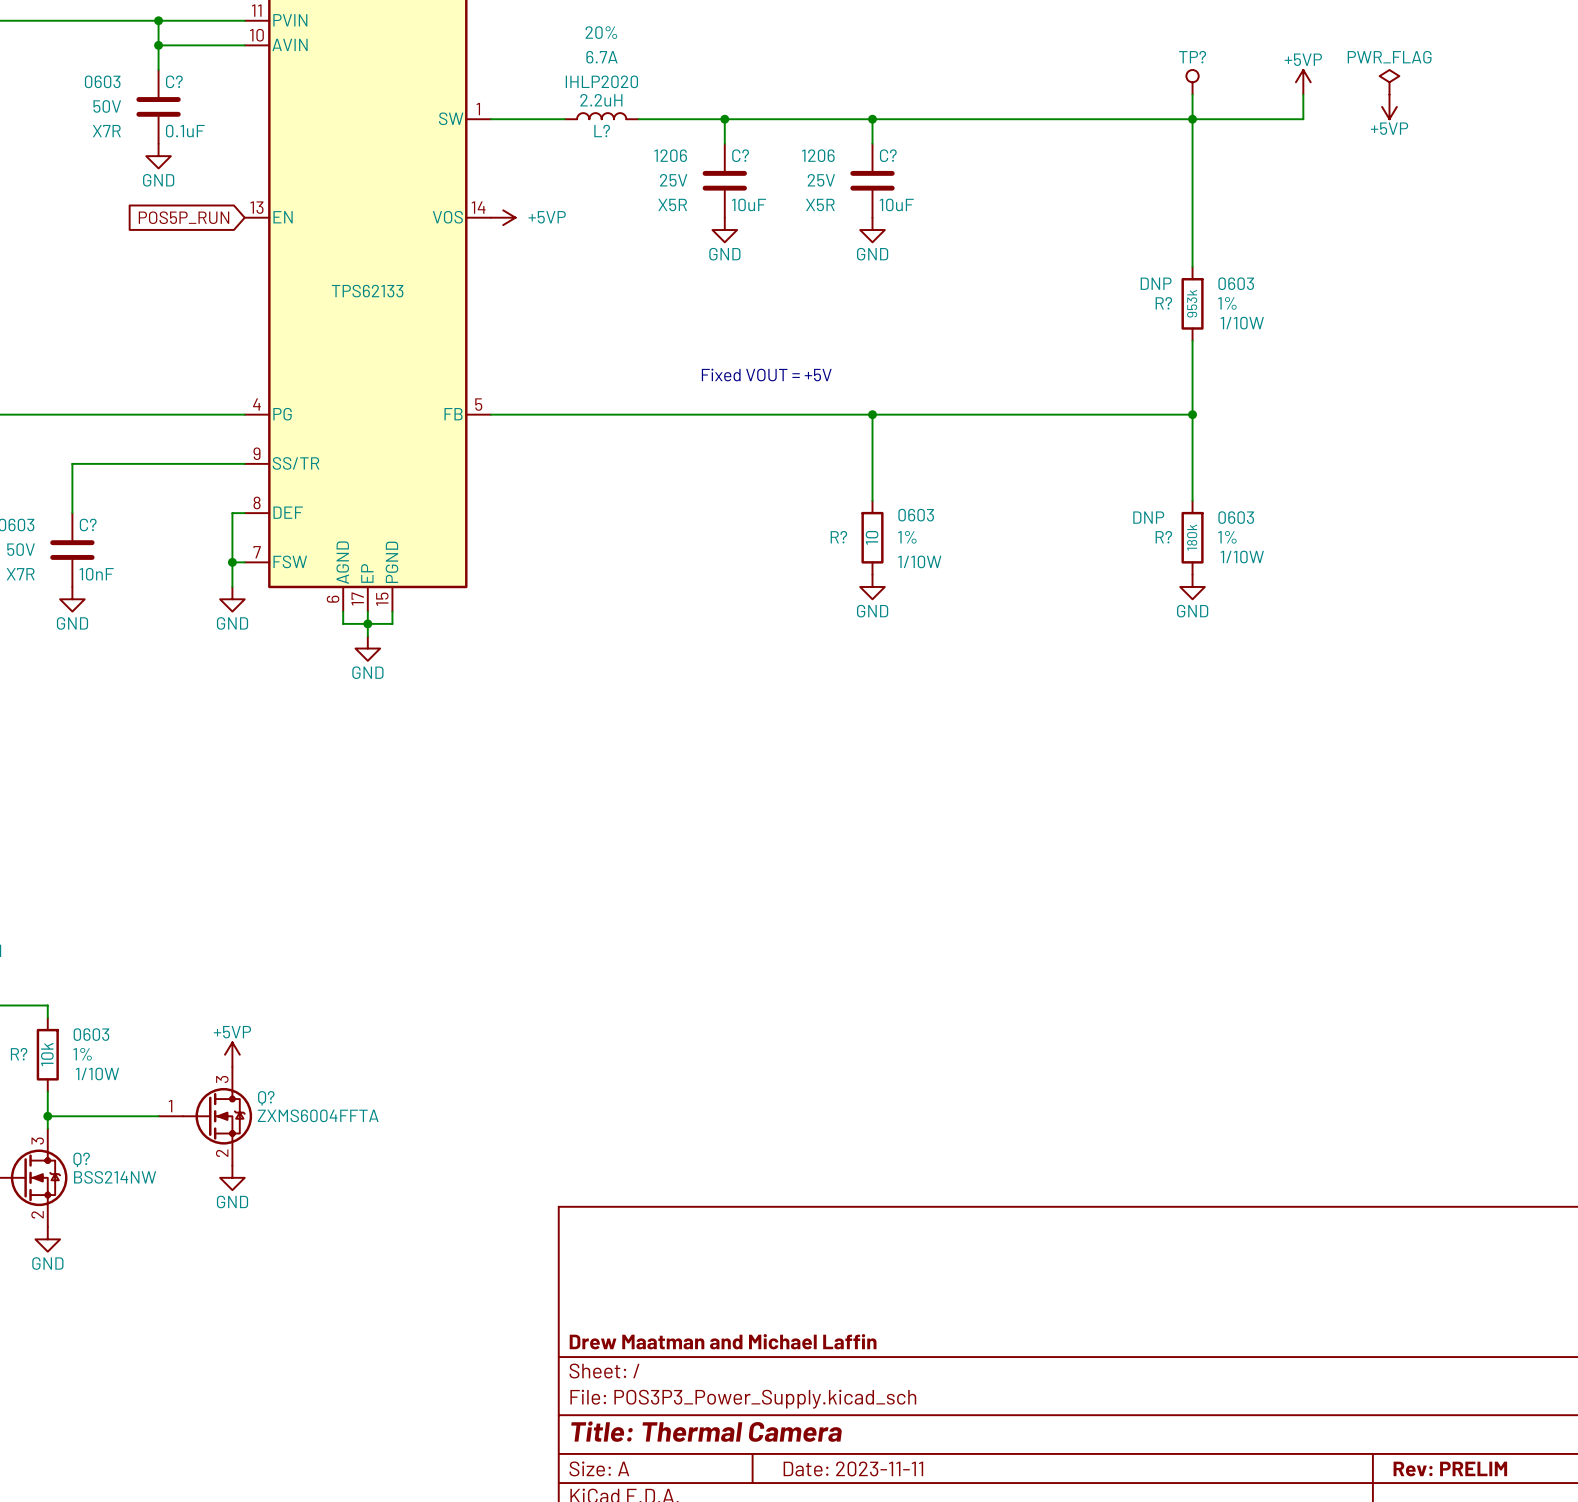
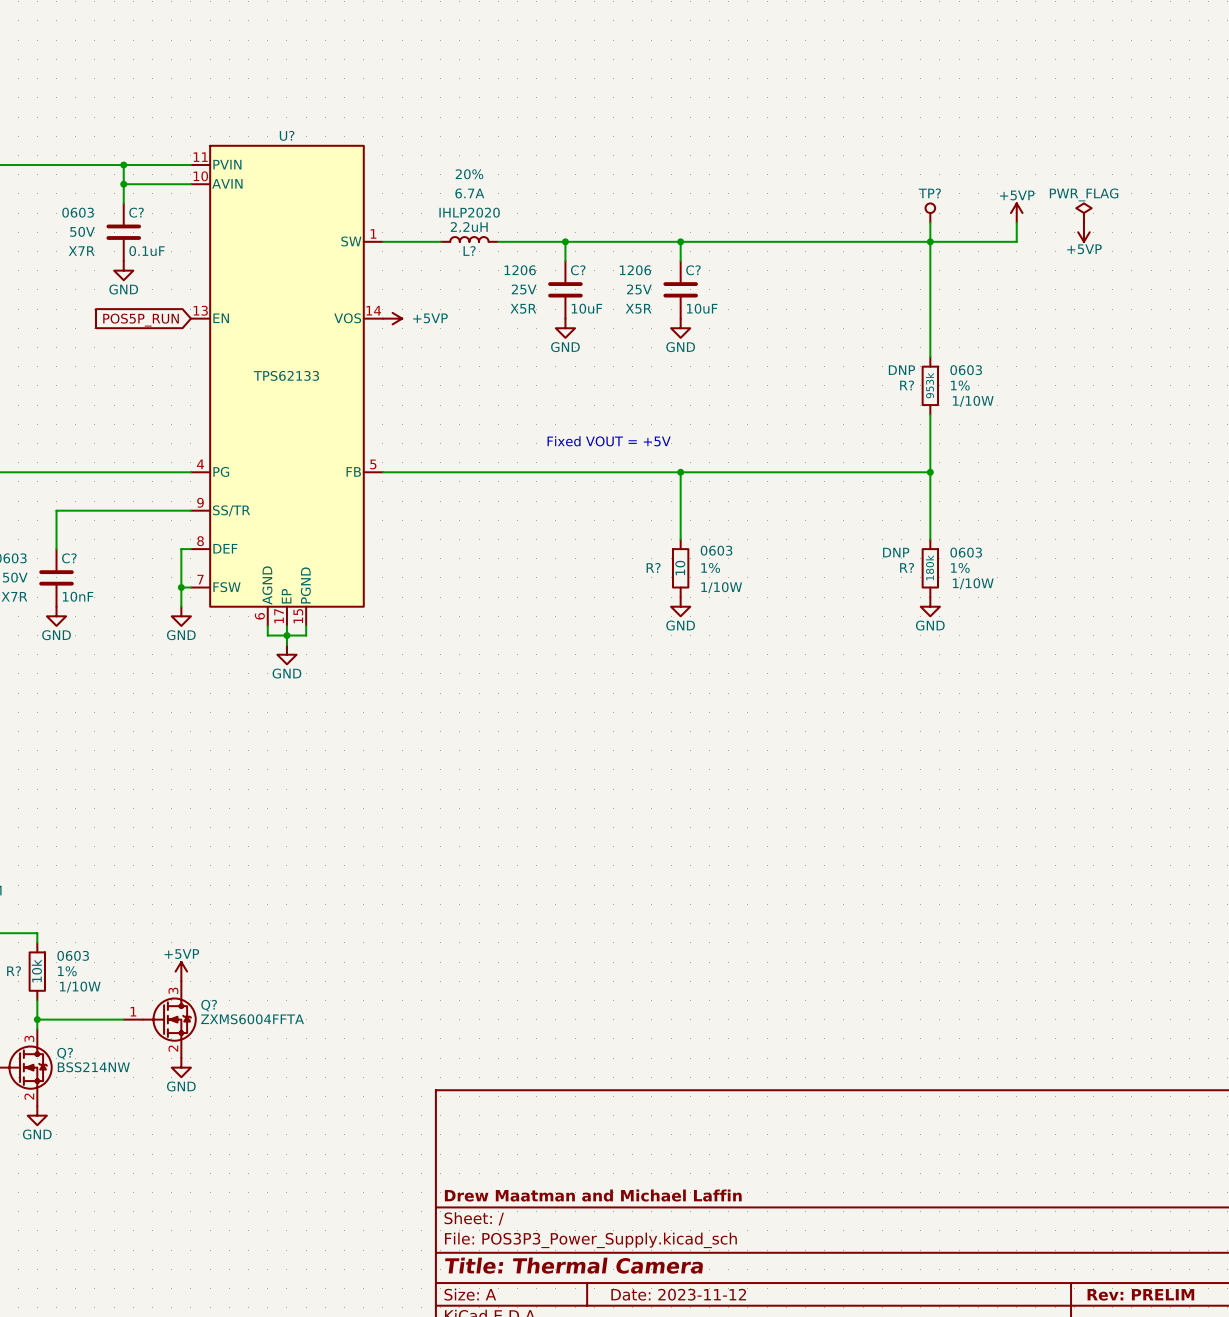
title block: Date: 2023-11-11 (853, 1468) -> Date: 2023-11-12 (678, 1294)

